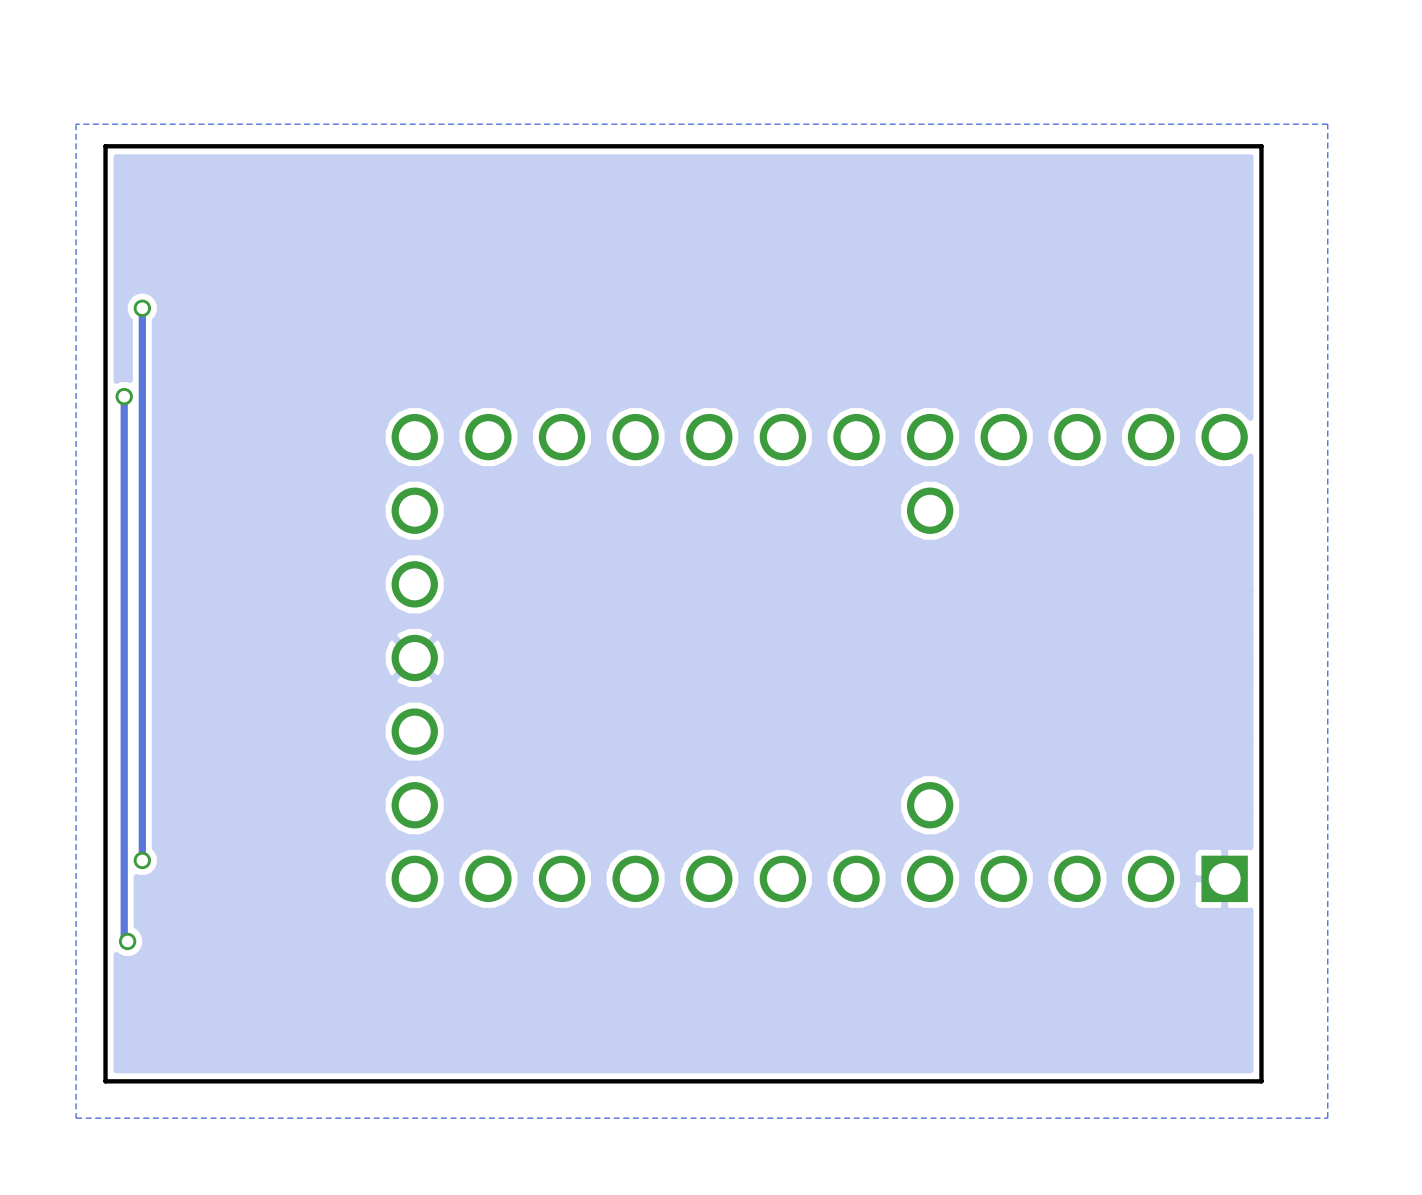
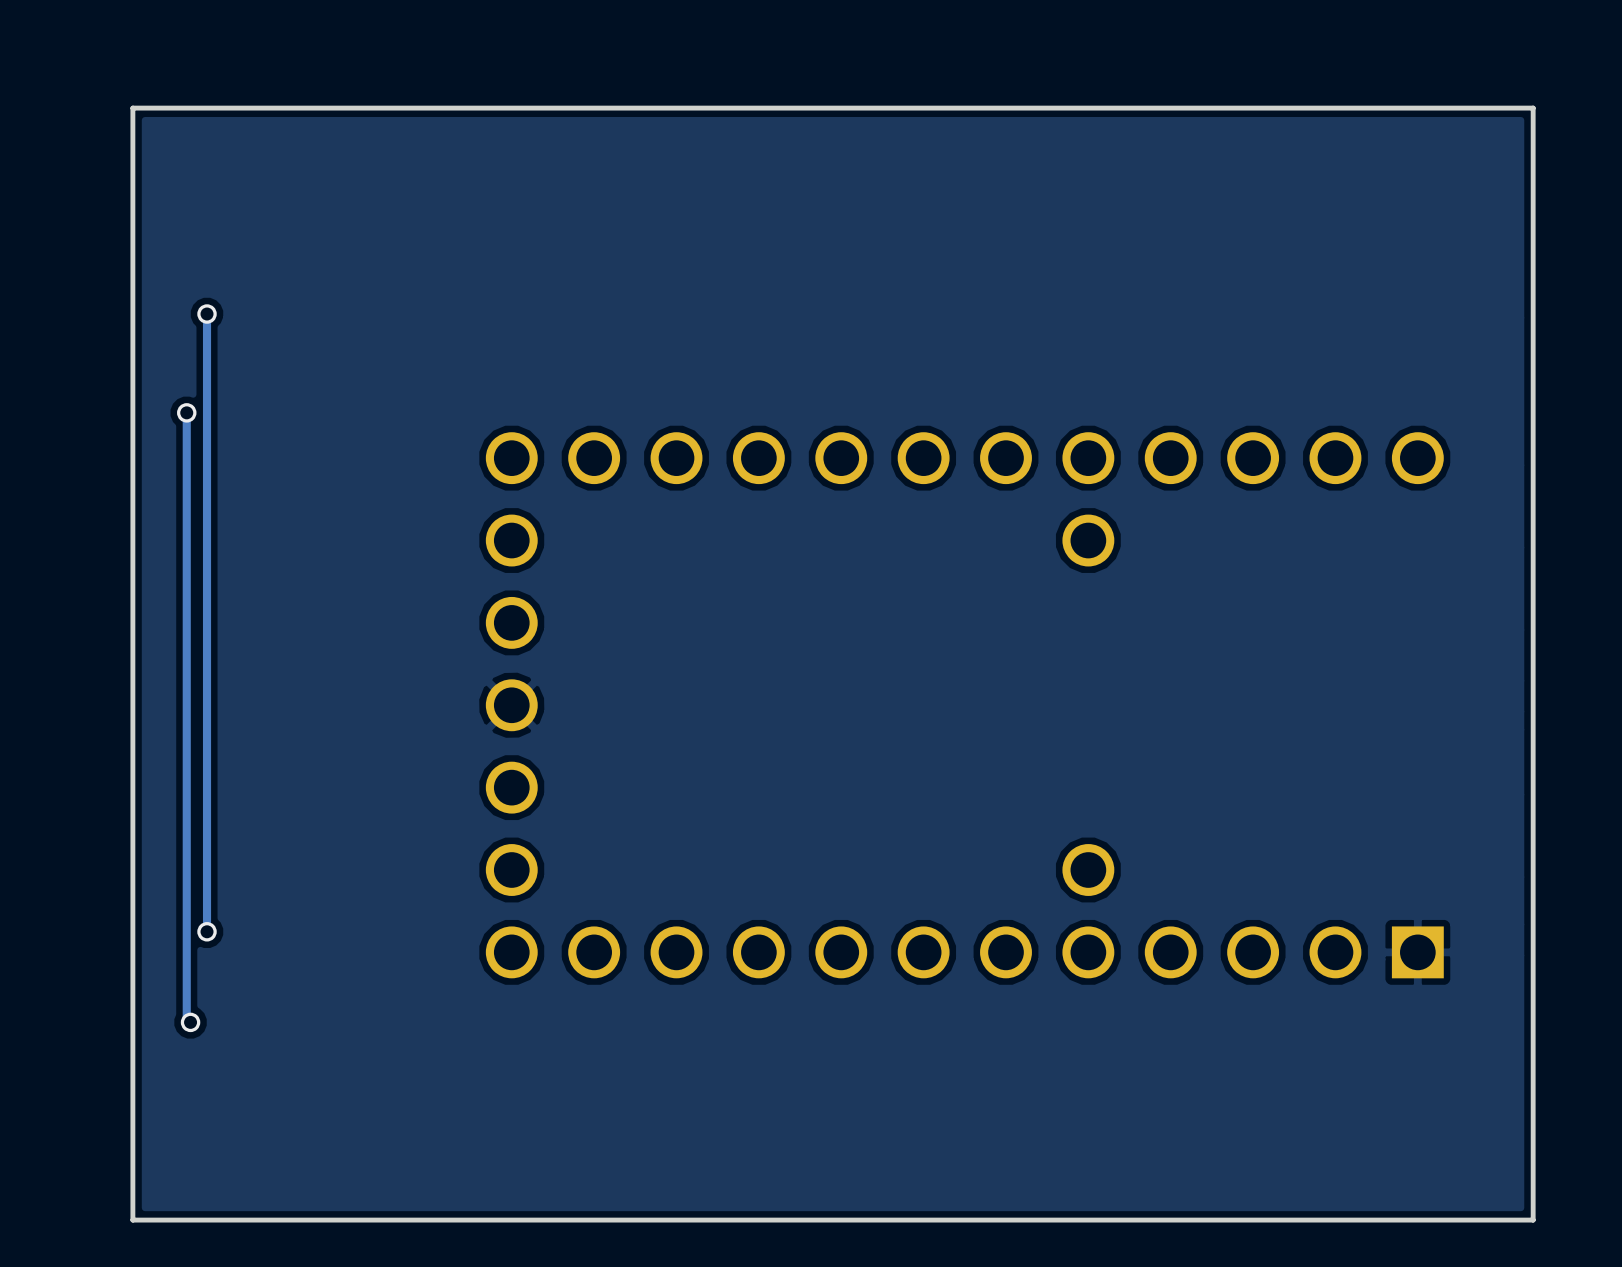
board edge: (1261, 146) (105, 146) (105, 1081) (1261, 1081) (1261, 146) -> (1533, 108) (1533, 1220) (132, 1220) (132, 108) (1533, 108)

